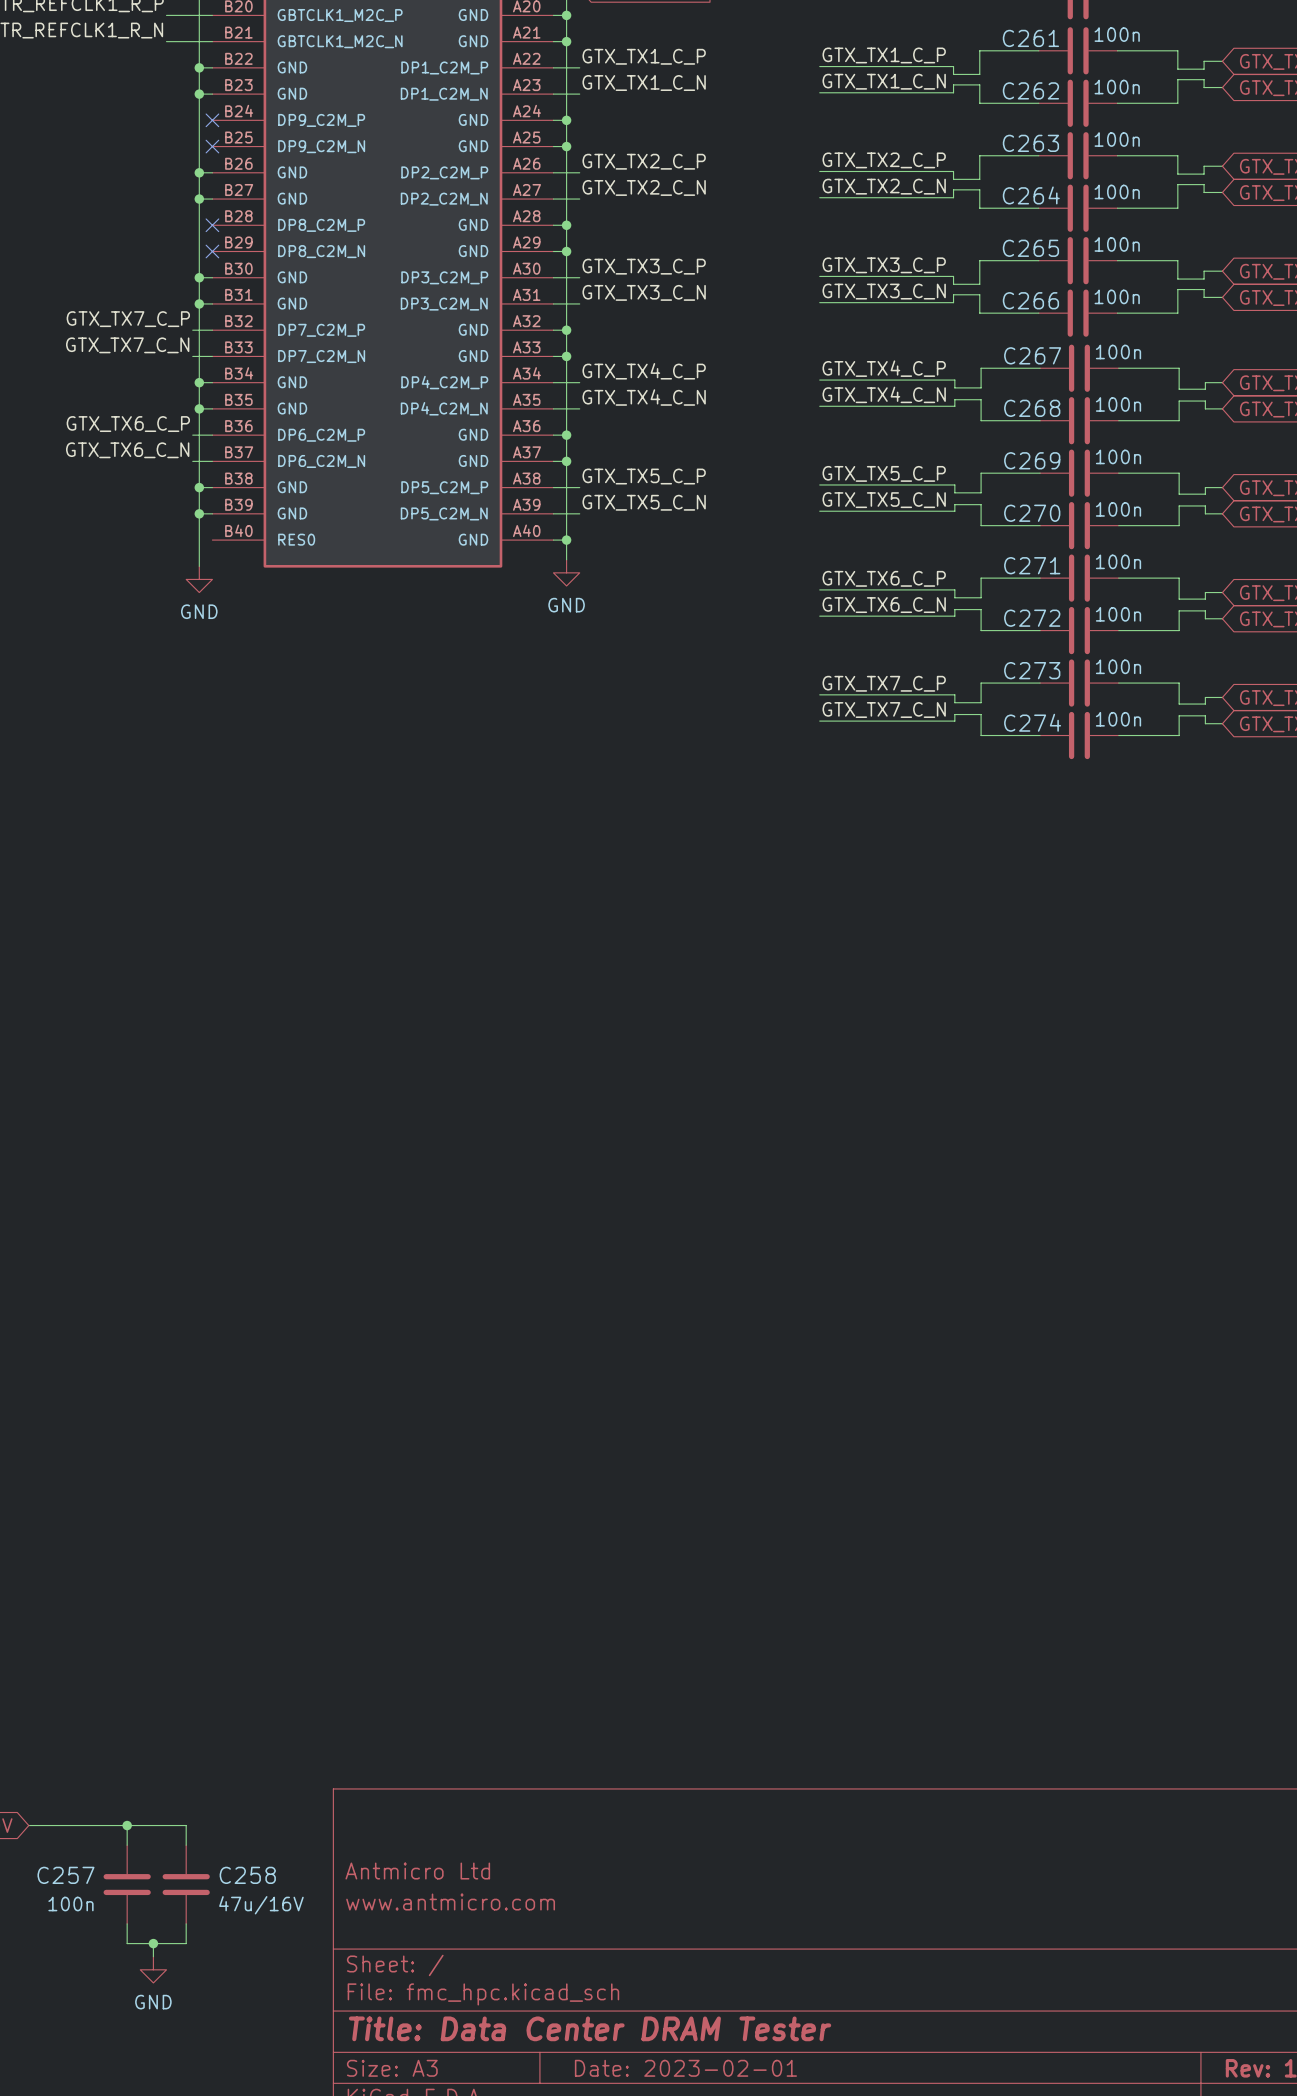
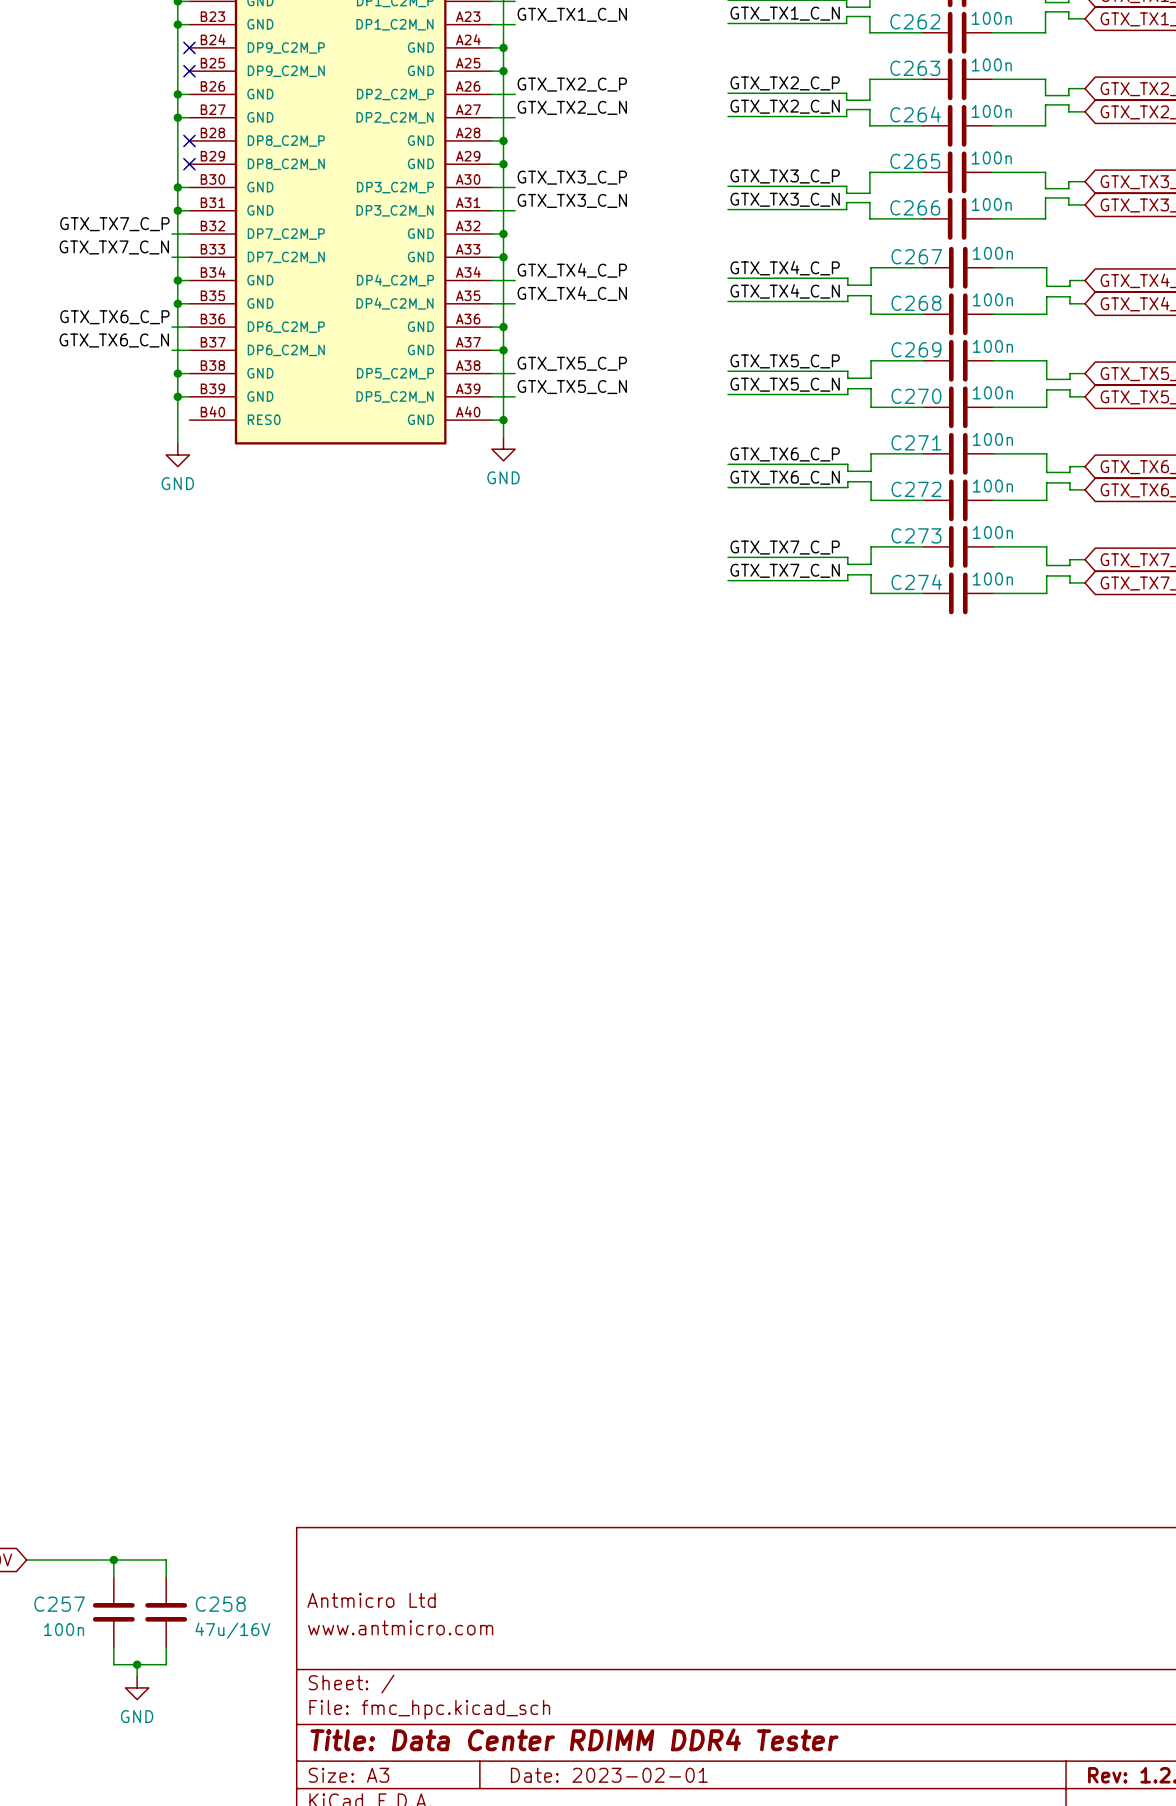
title block: Title: Data Center DRAM Tester (590, 2028) -> Title: Data Center RDIMM DDR4 Tester (574, 1739)

